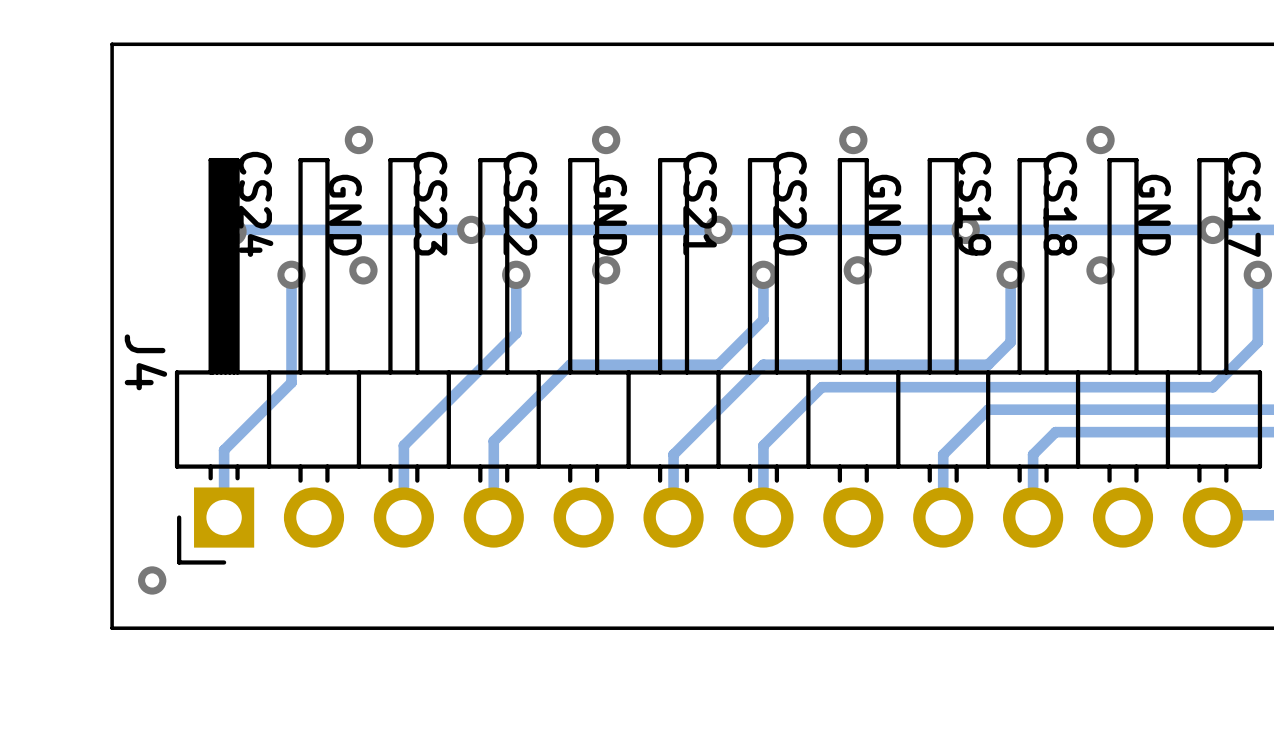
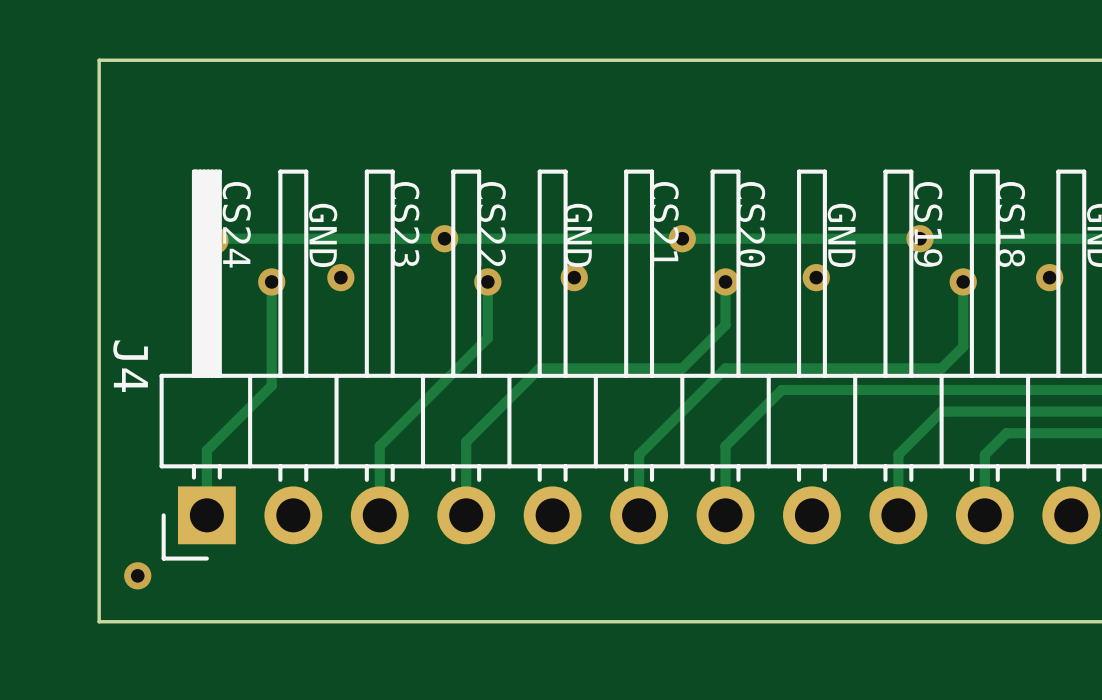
via: (358, 140) -> none
via: (606, 140) -> none
via: (853, 140) -> none
via: (1100, 140) -> none

